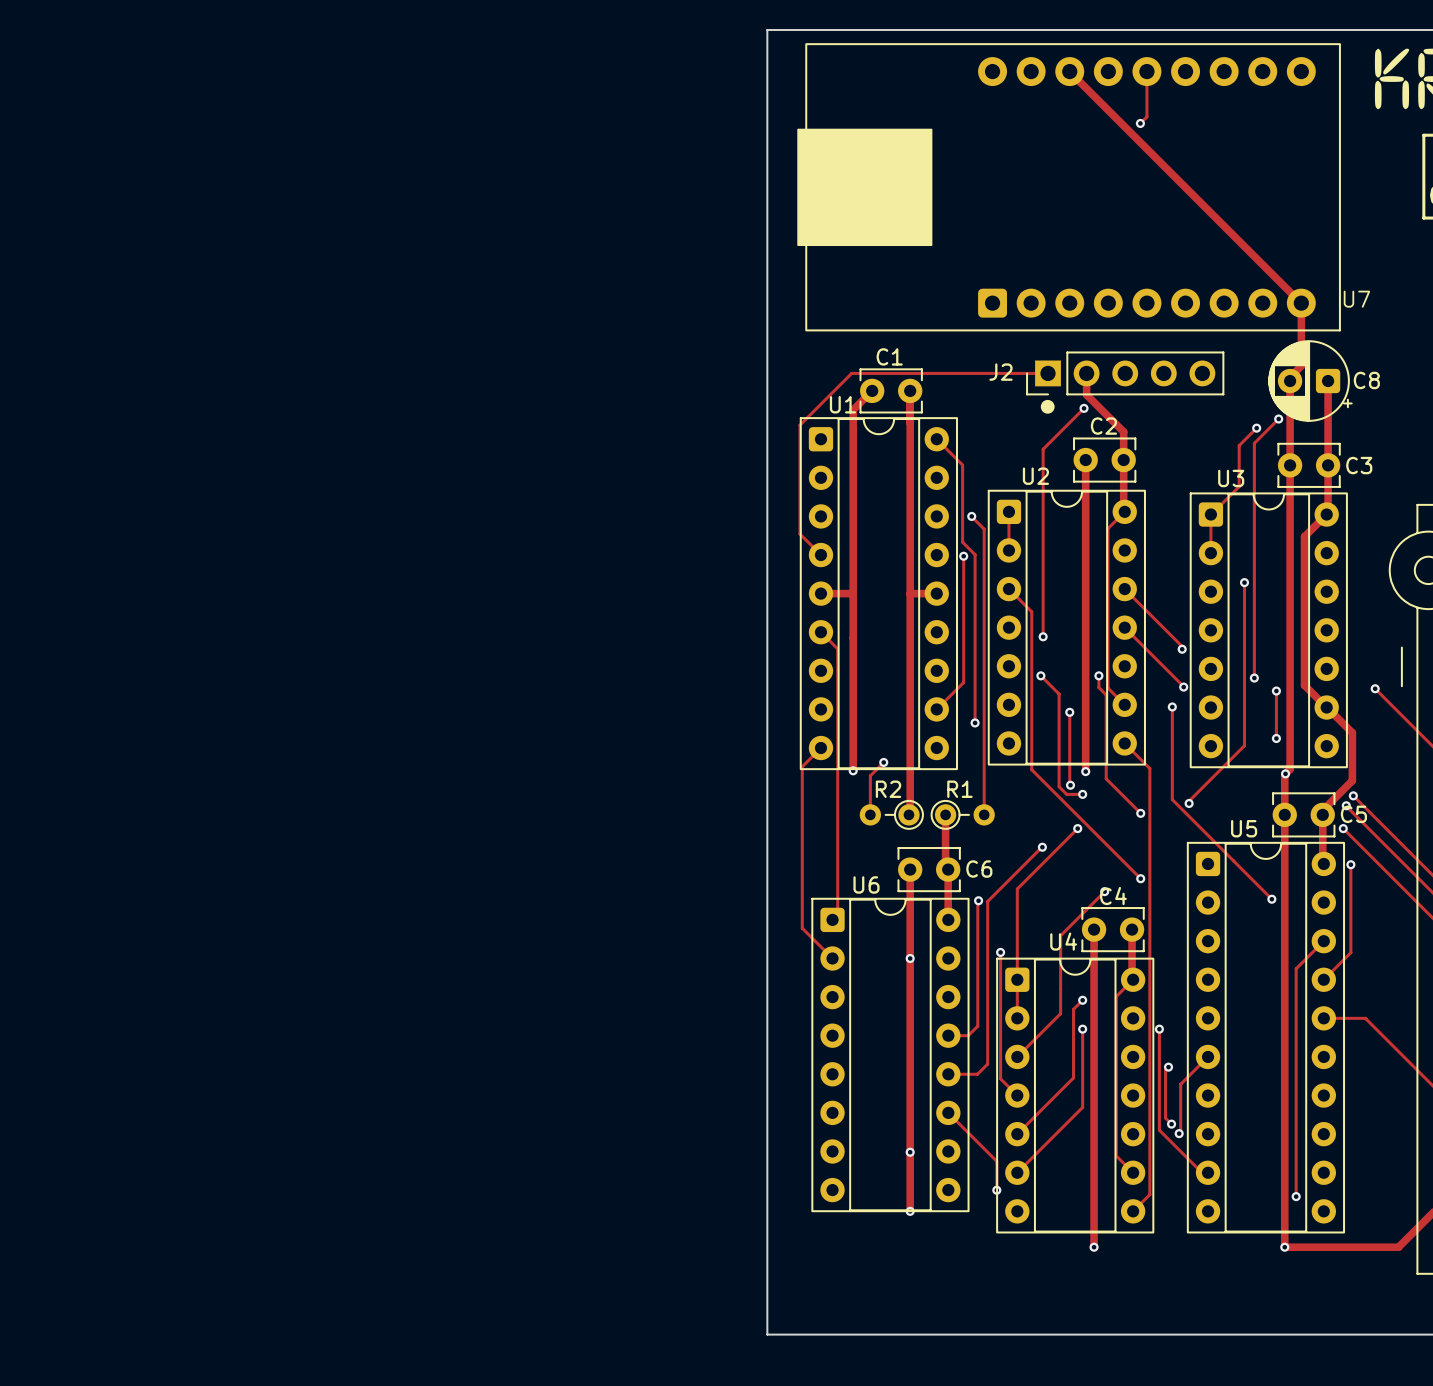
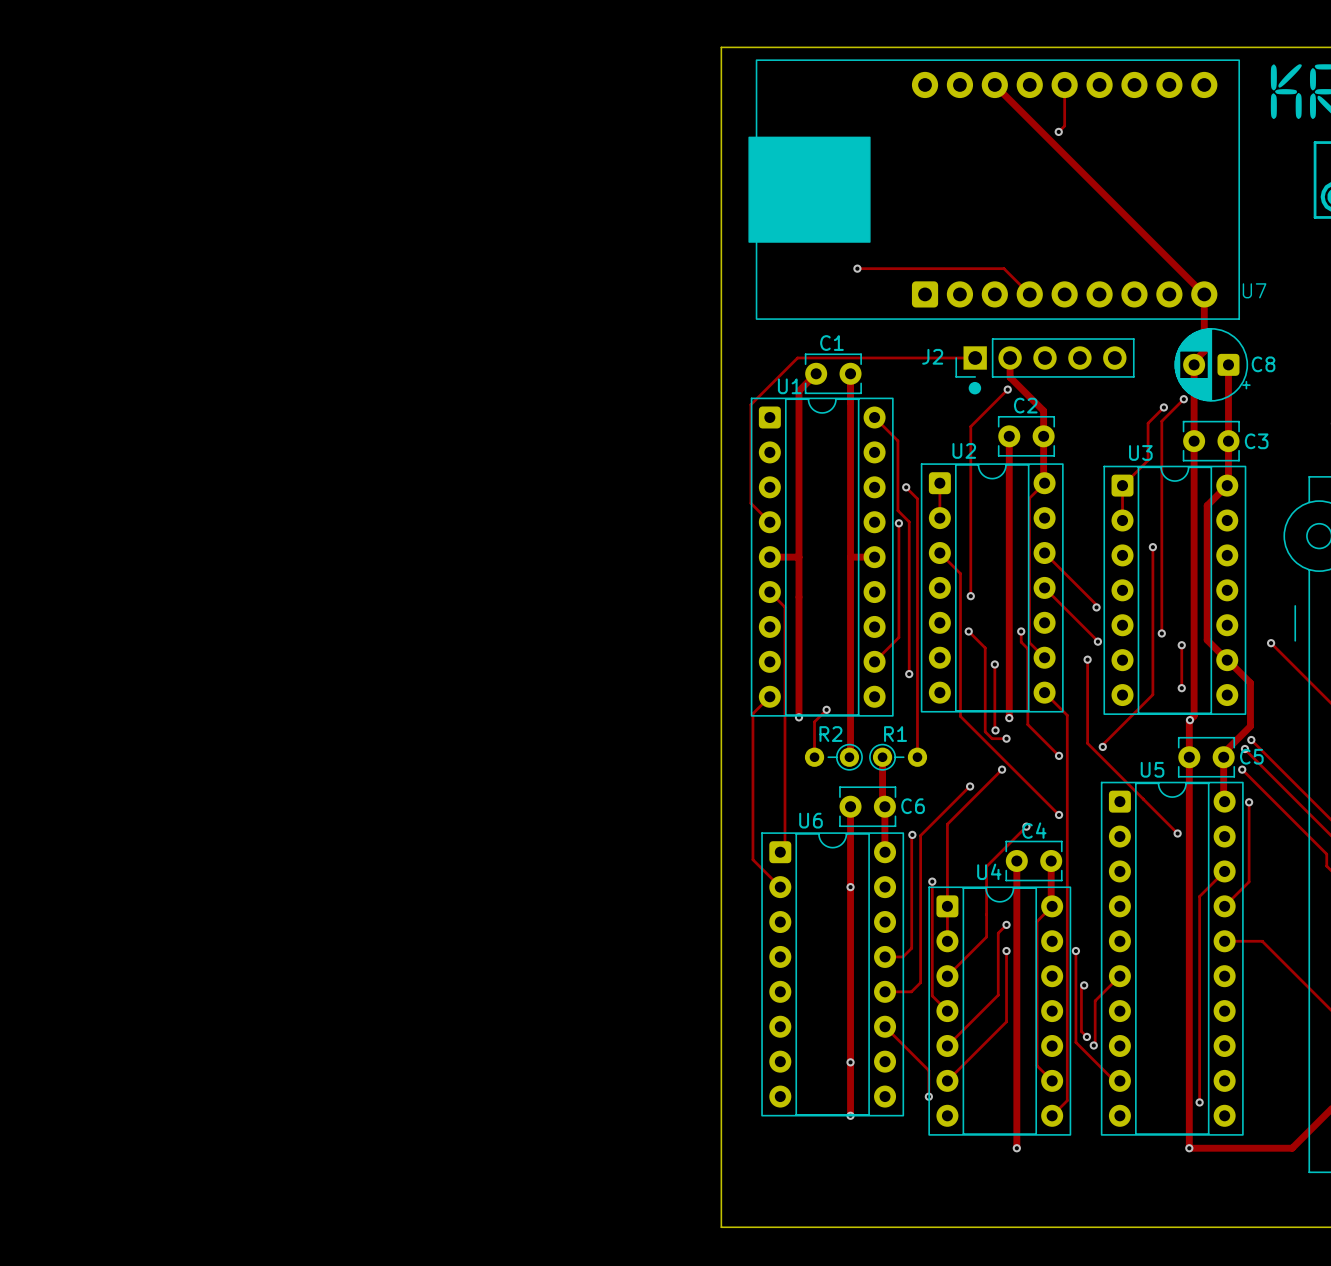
track: none -> (857, 268) (1003, 268) (1029, 294)
via: none -> (857, 268)

